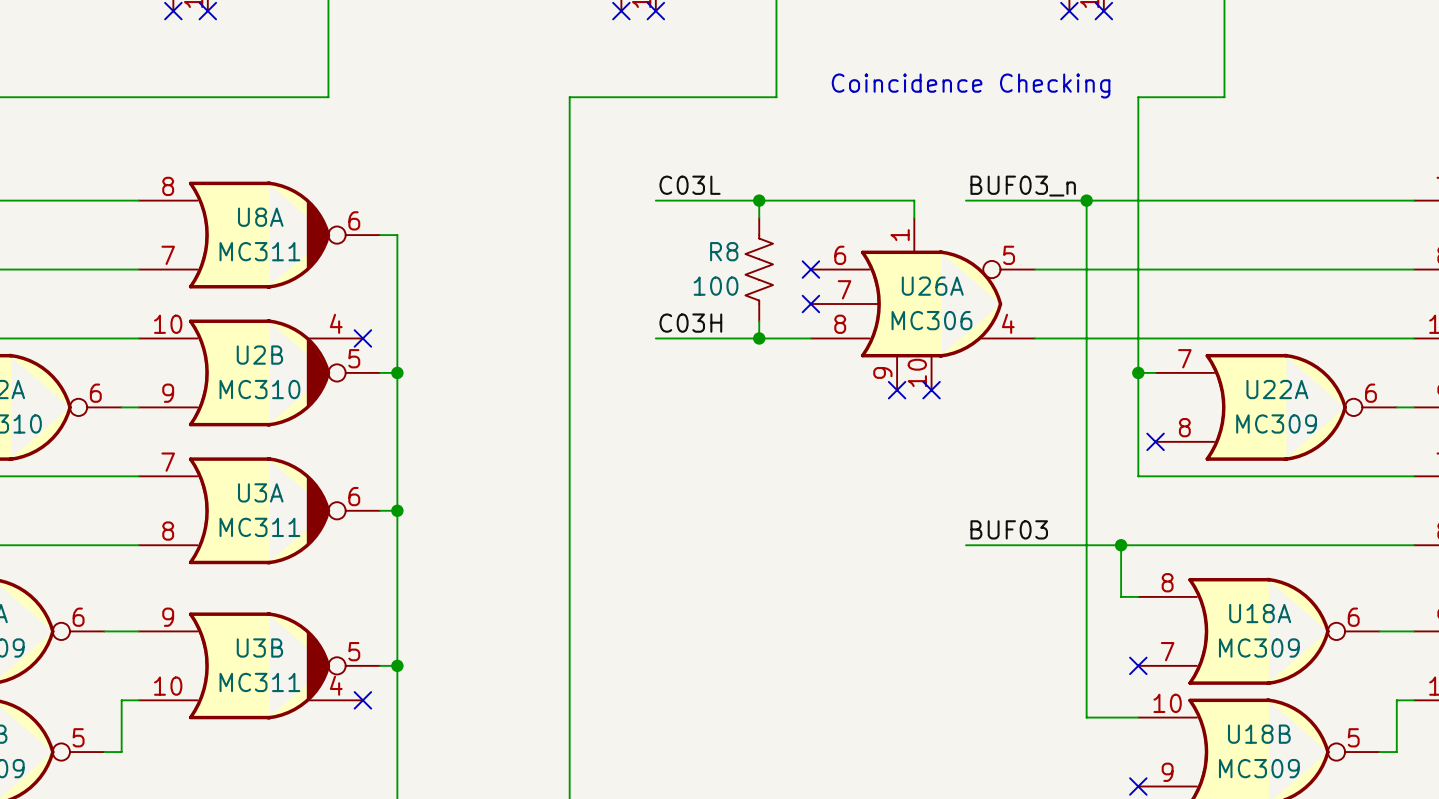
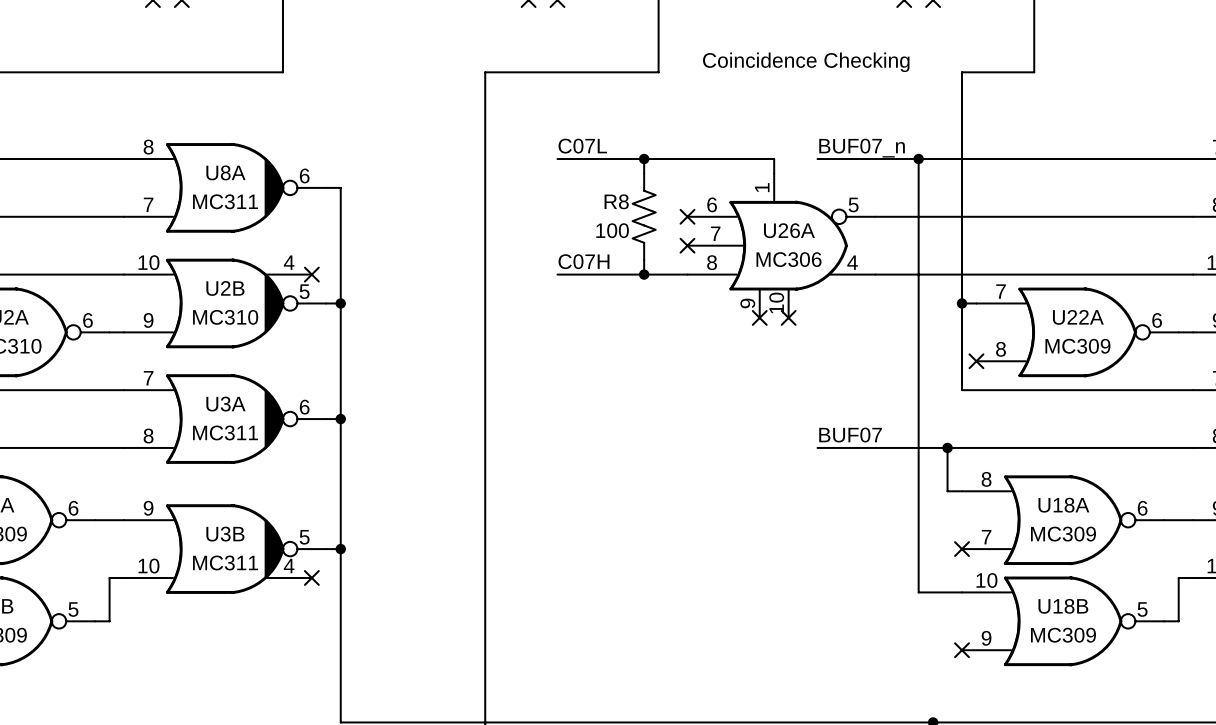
label: C03L (690, 185) -> C07L (582, 146)
label: BUF03_n (1023, 186) -> BUF07_n (862, 148)
label: C03H (690, 323) -> C07H (583, 261)
label: BUF03 (1009, 529) -> BUF07 (850, 435)

